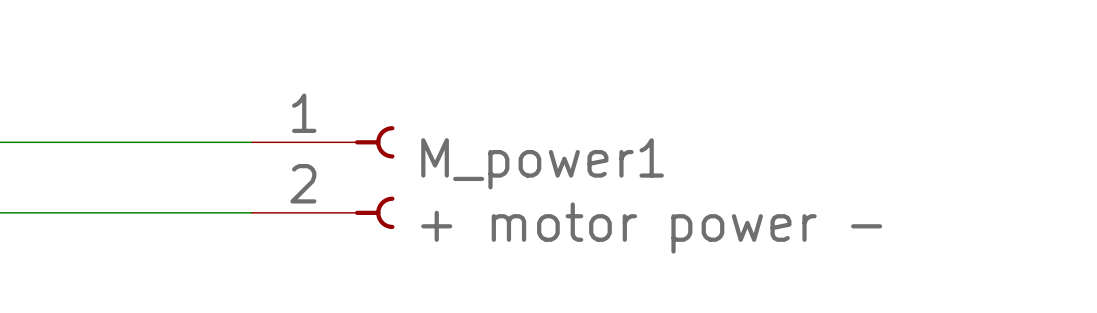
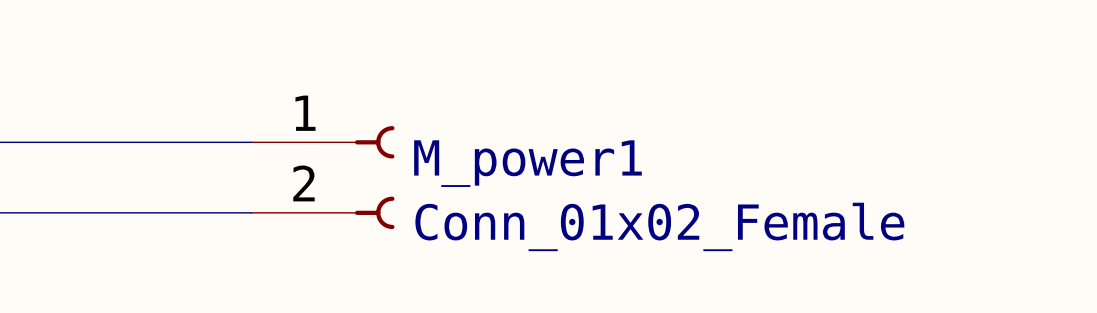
M_power1 value: + motor power - (651, 227) -> Conn_01x02_Female (659, 226)

